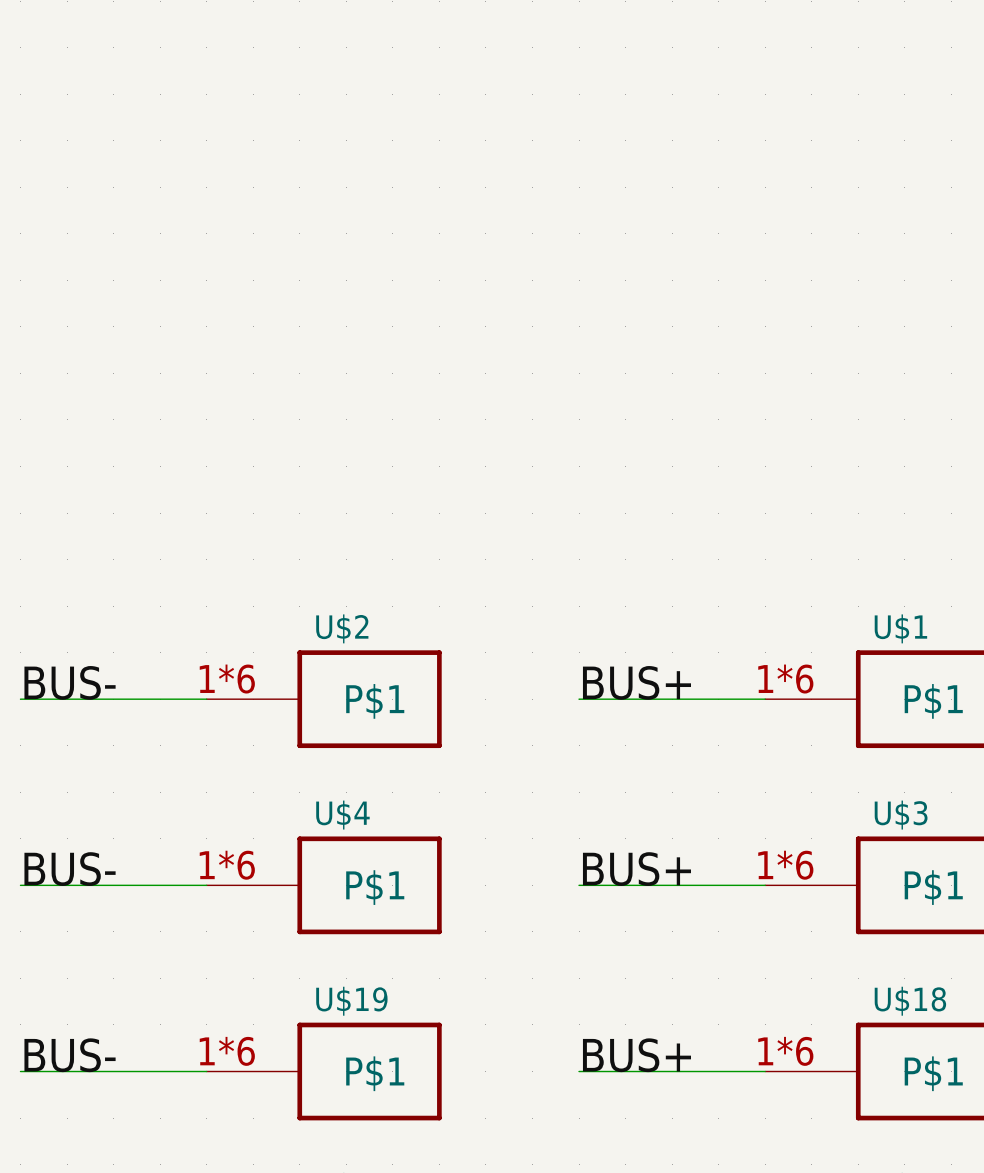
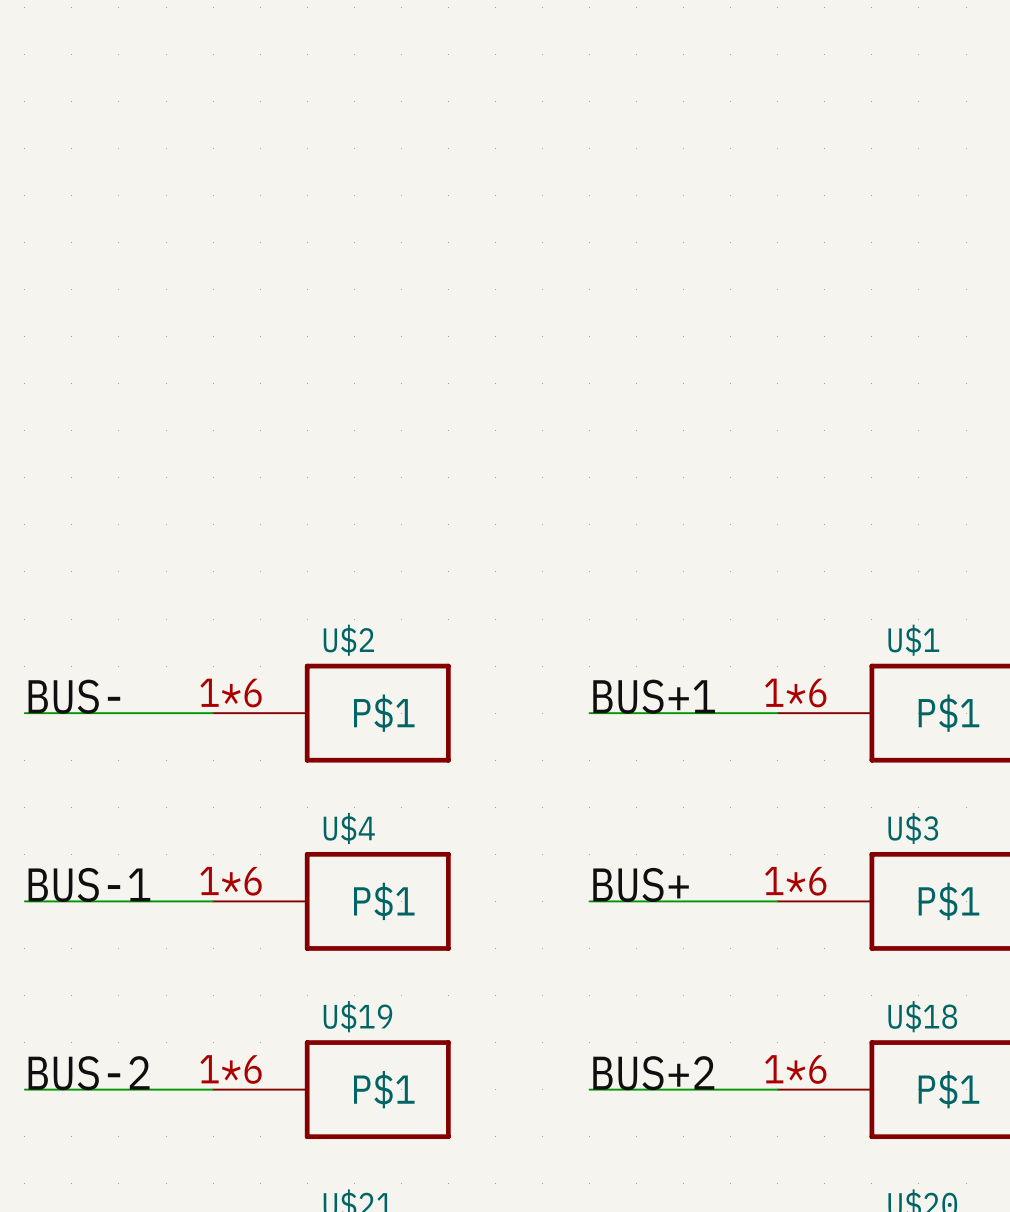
label: BUS+ (636, 682) -> BUS+1 (654, 696)
label: BUS- (70, 869) -> BUS-1 (89, 884)
label: BUS- (70, 1055) -> BUS-2 (89, 1073)
label: BUS+ (636, 1055) -> BUS+2 (653, 1073)

